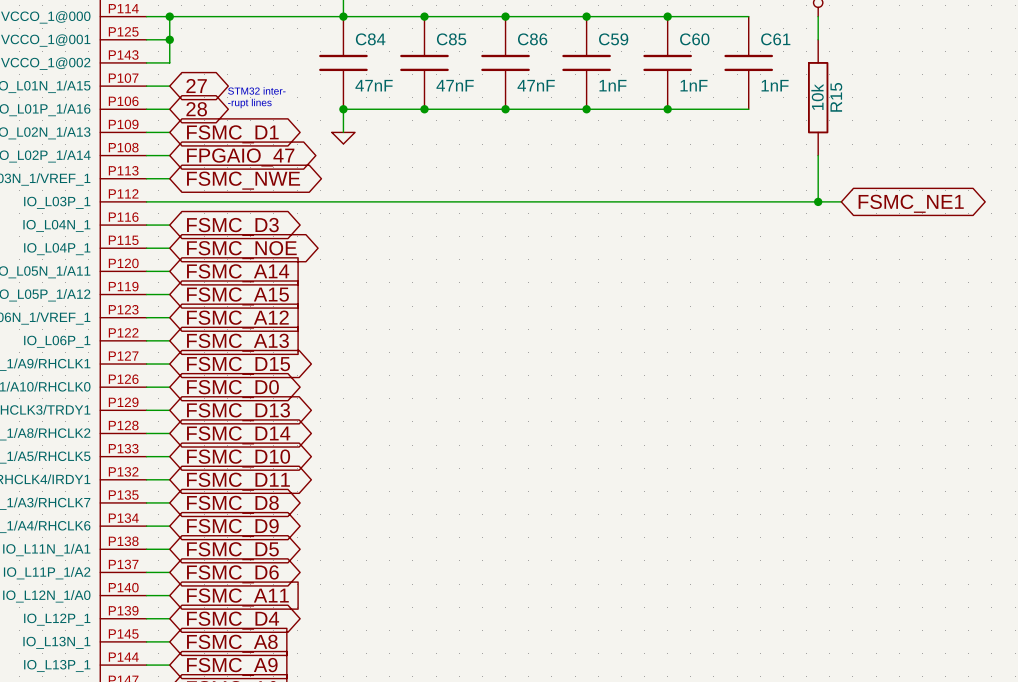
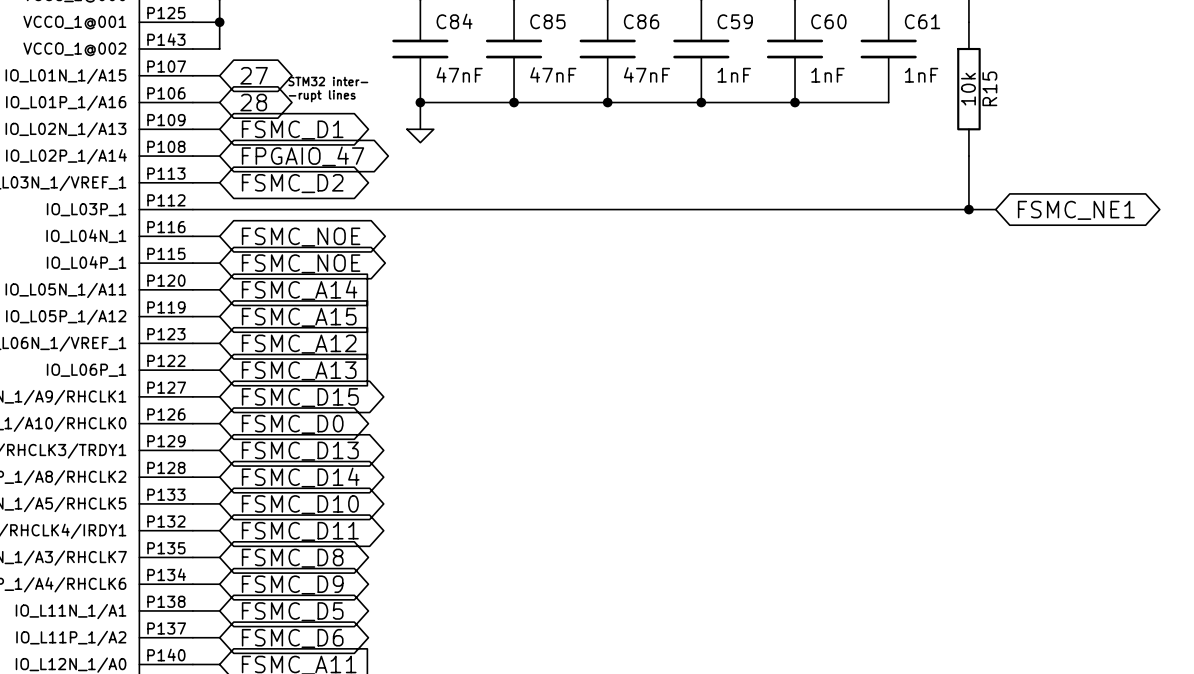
global label: FSMC_NWE (243, 180) -> FSMC_D2 (292, 183)
global label: FSMC_D3 (232, 226) -> FSMC_NOE (301, 237)

